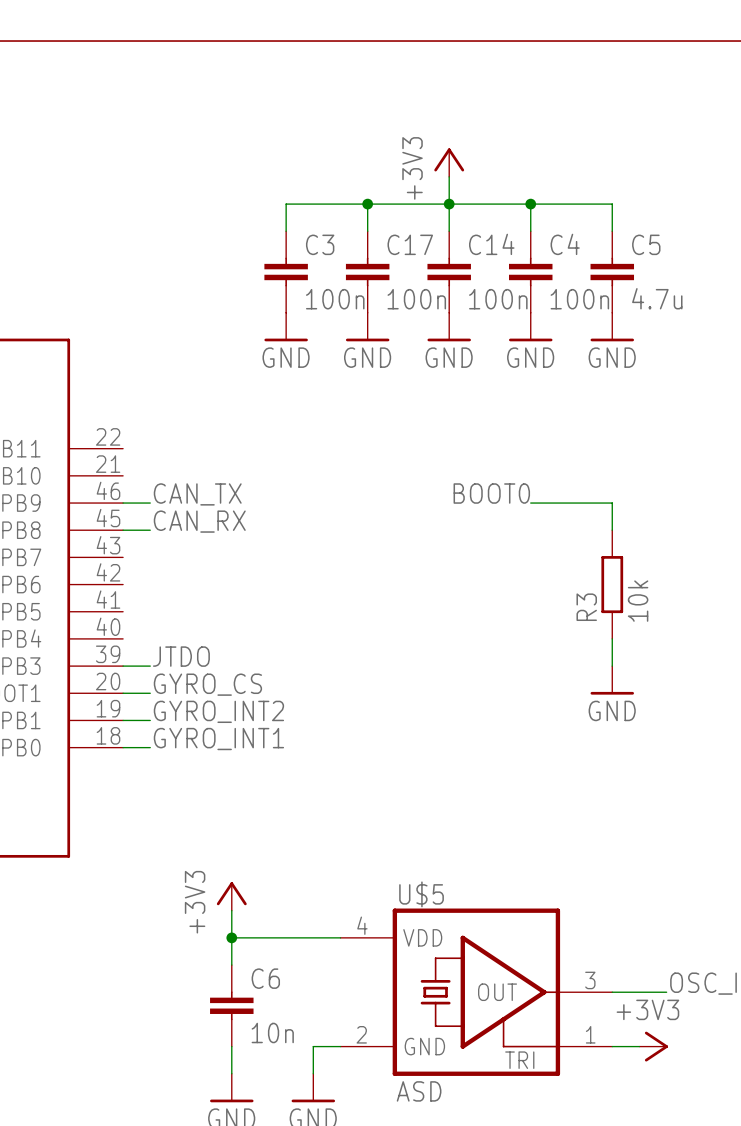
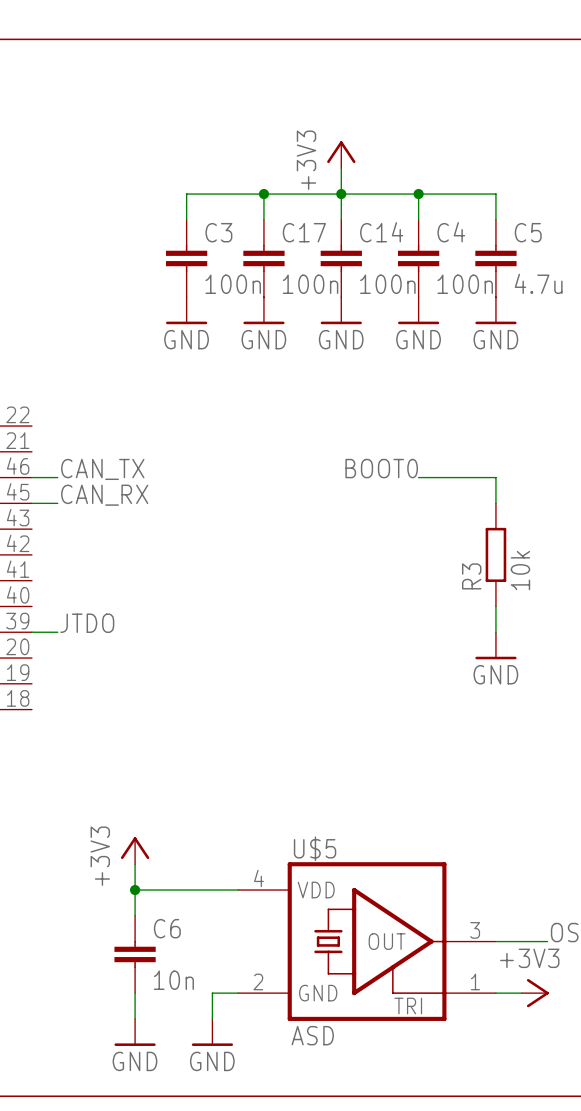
label: GYRO_CS (207, 684) -> none
wire: (123, 693) (150, 693) -> none
label: GYRO_INT2 (218, 711) -> none
wire: (123, 720) (150, 720) -> none
label: GYRO_INT1 (218, 739) -> none
wire: (123, 747) (150, 747) -> none

